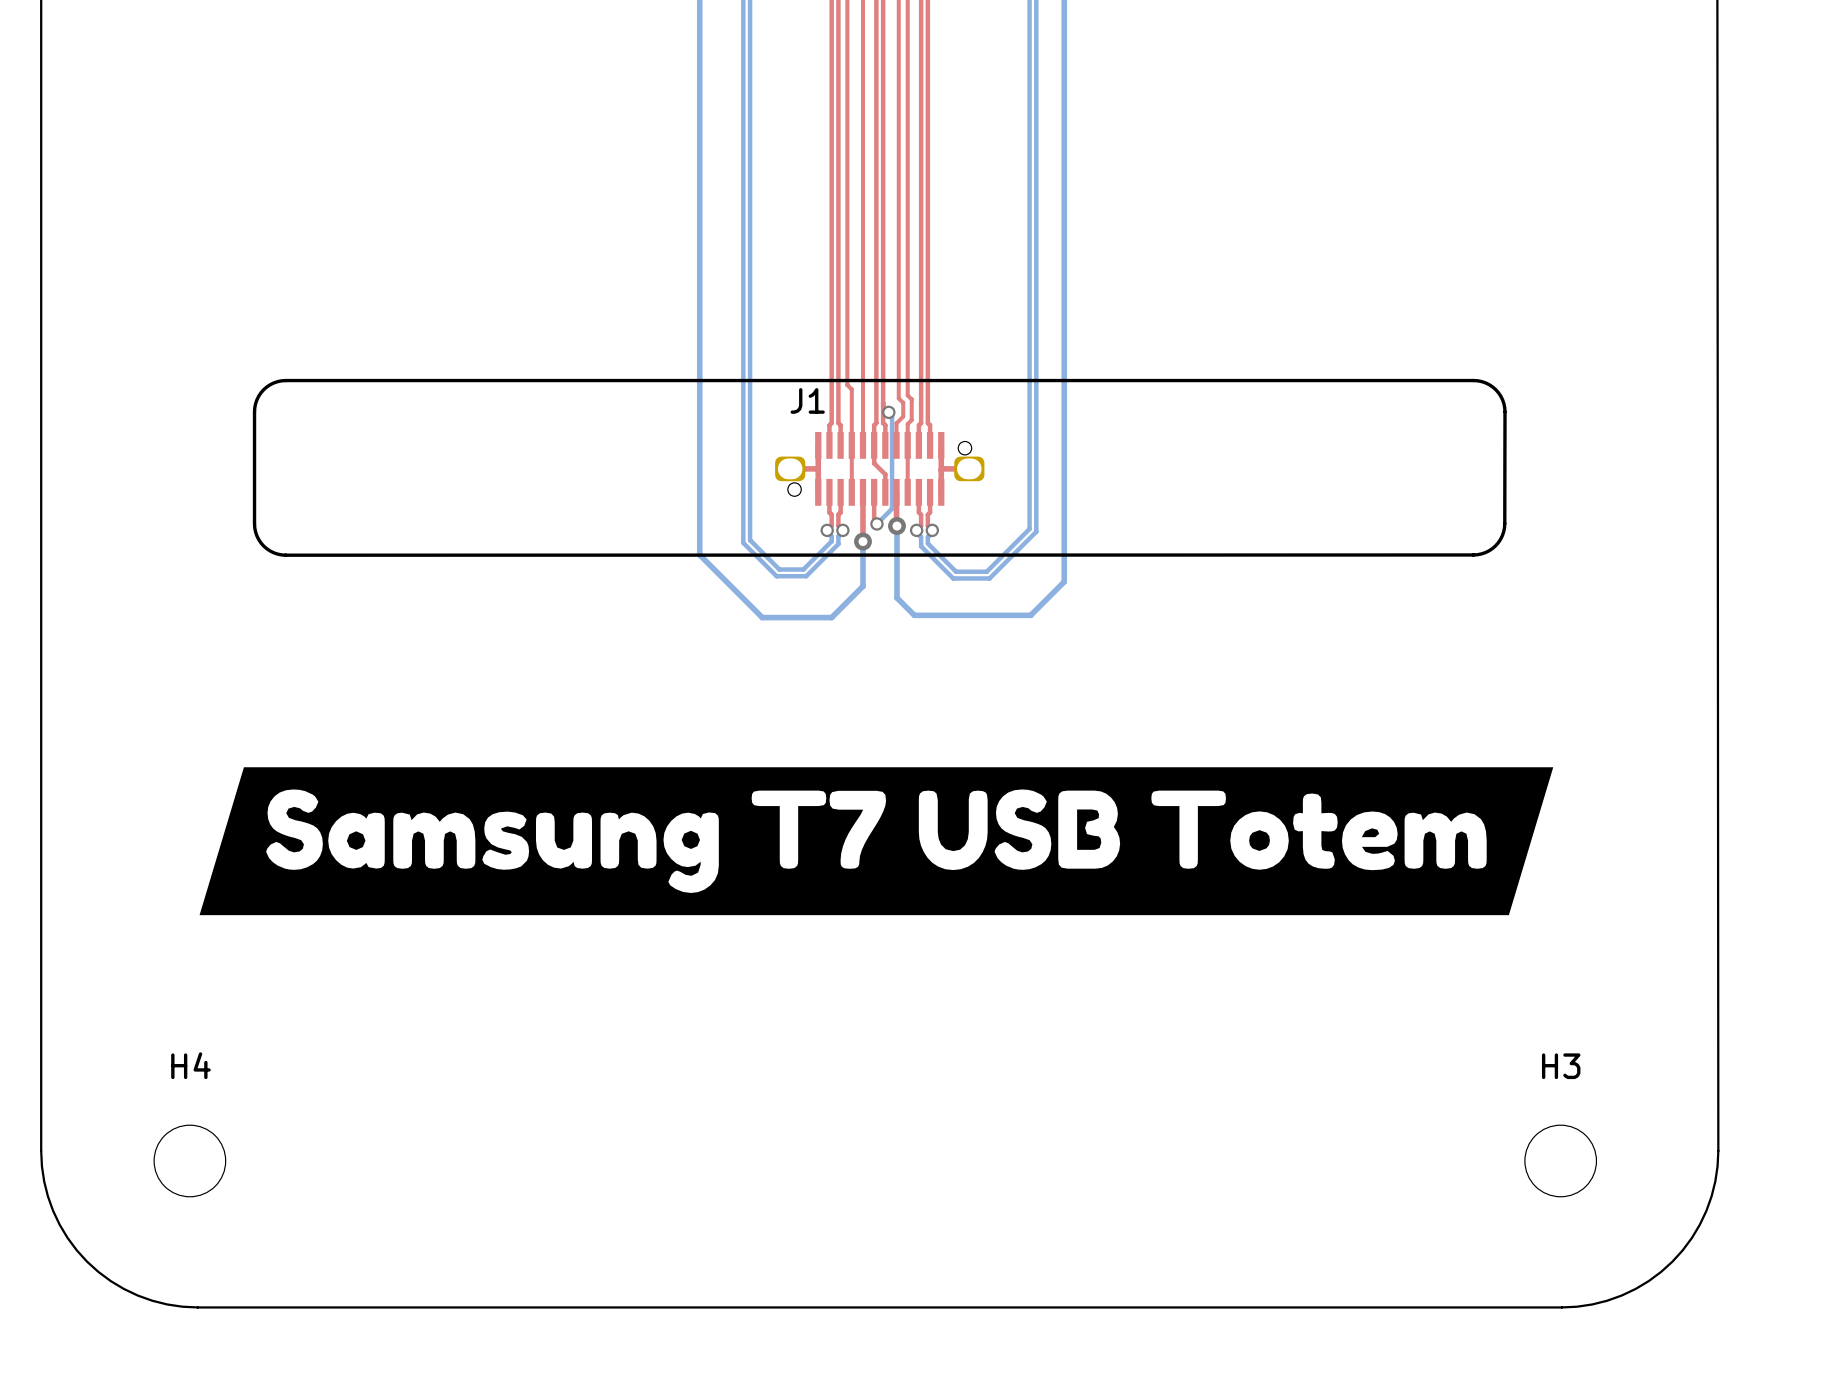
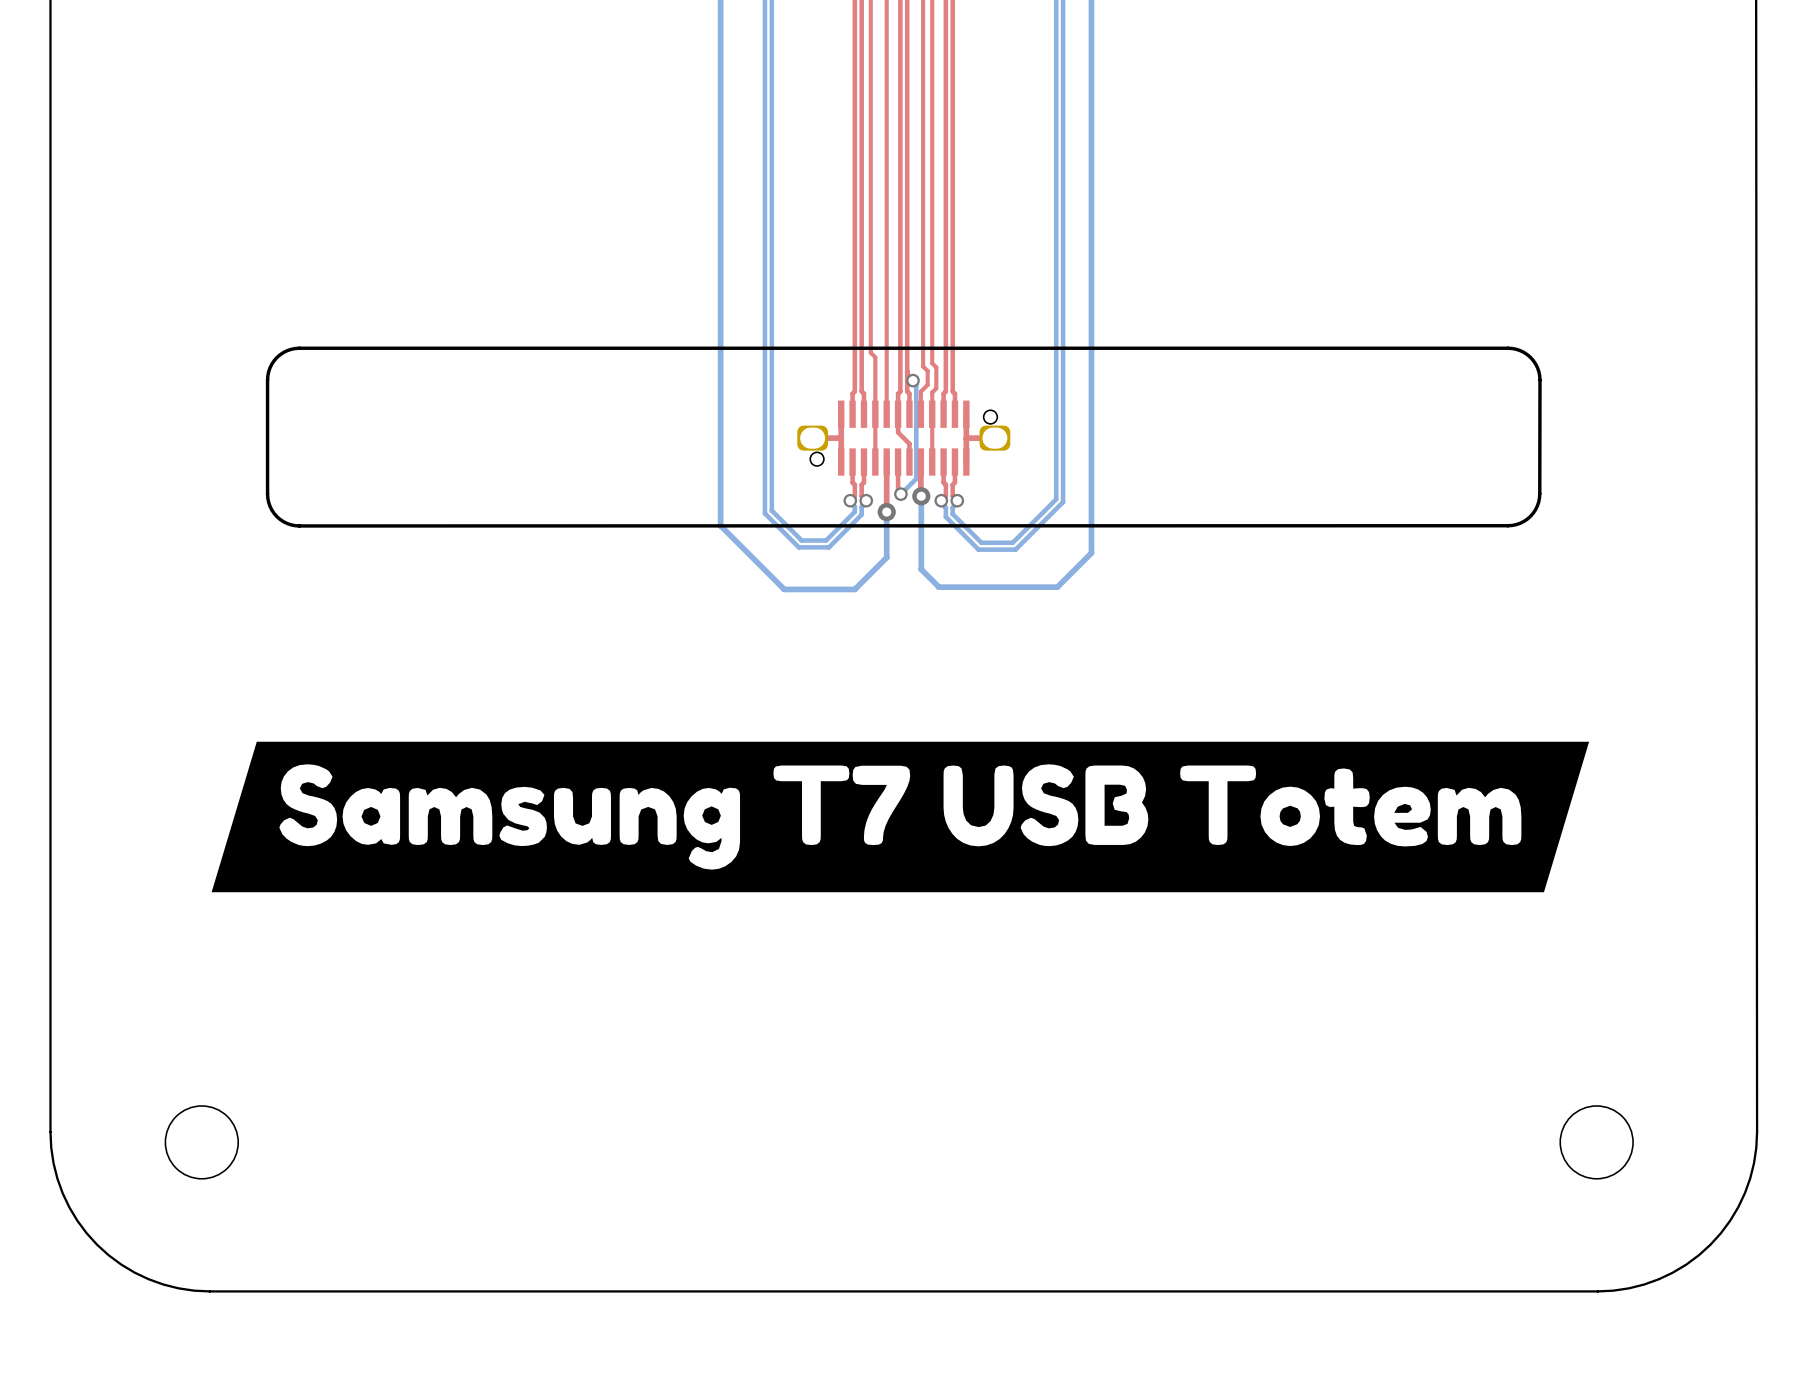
J1 name: J1 (807, 400) -> none
H4 name: H4 (190, 1065) -> none
H3 name: H3 (1561, 1066) -> none

